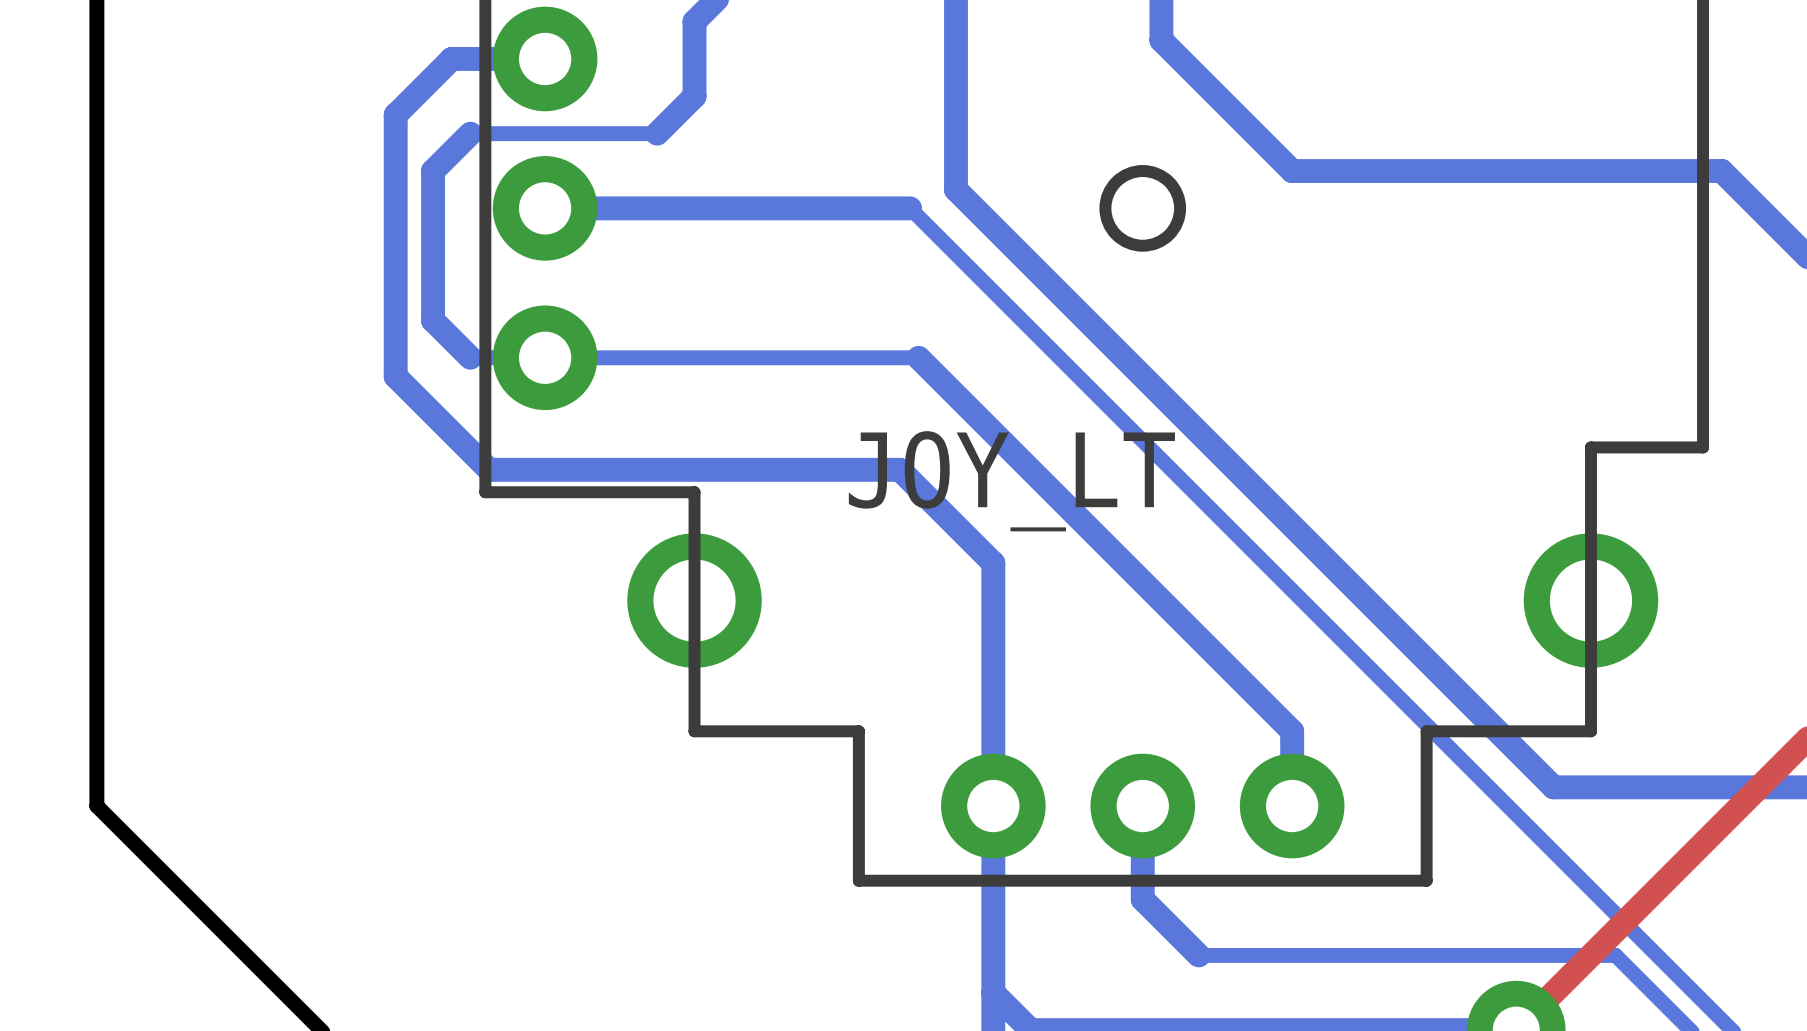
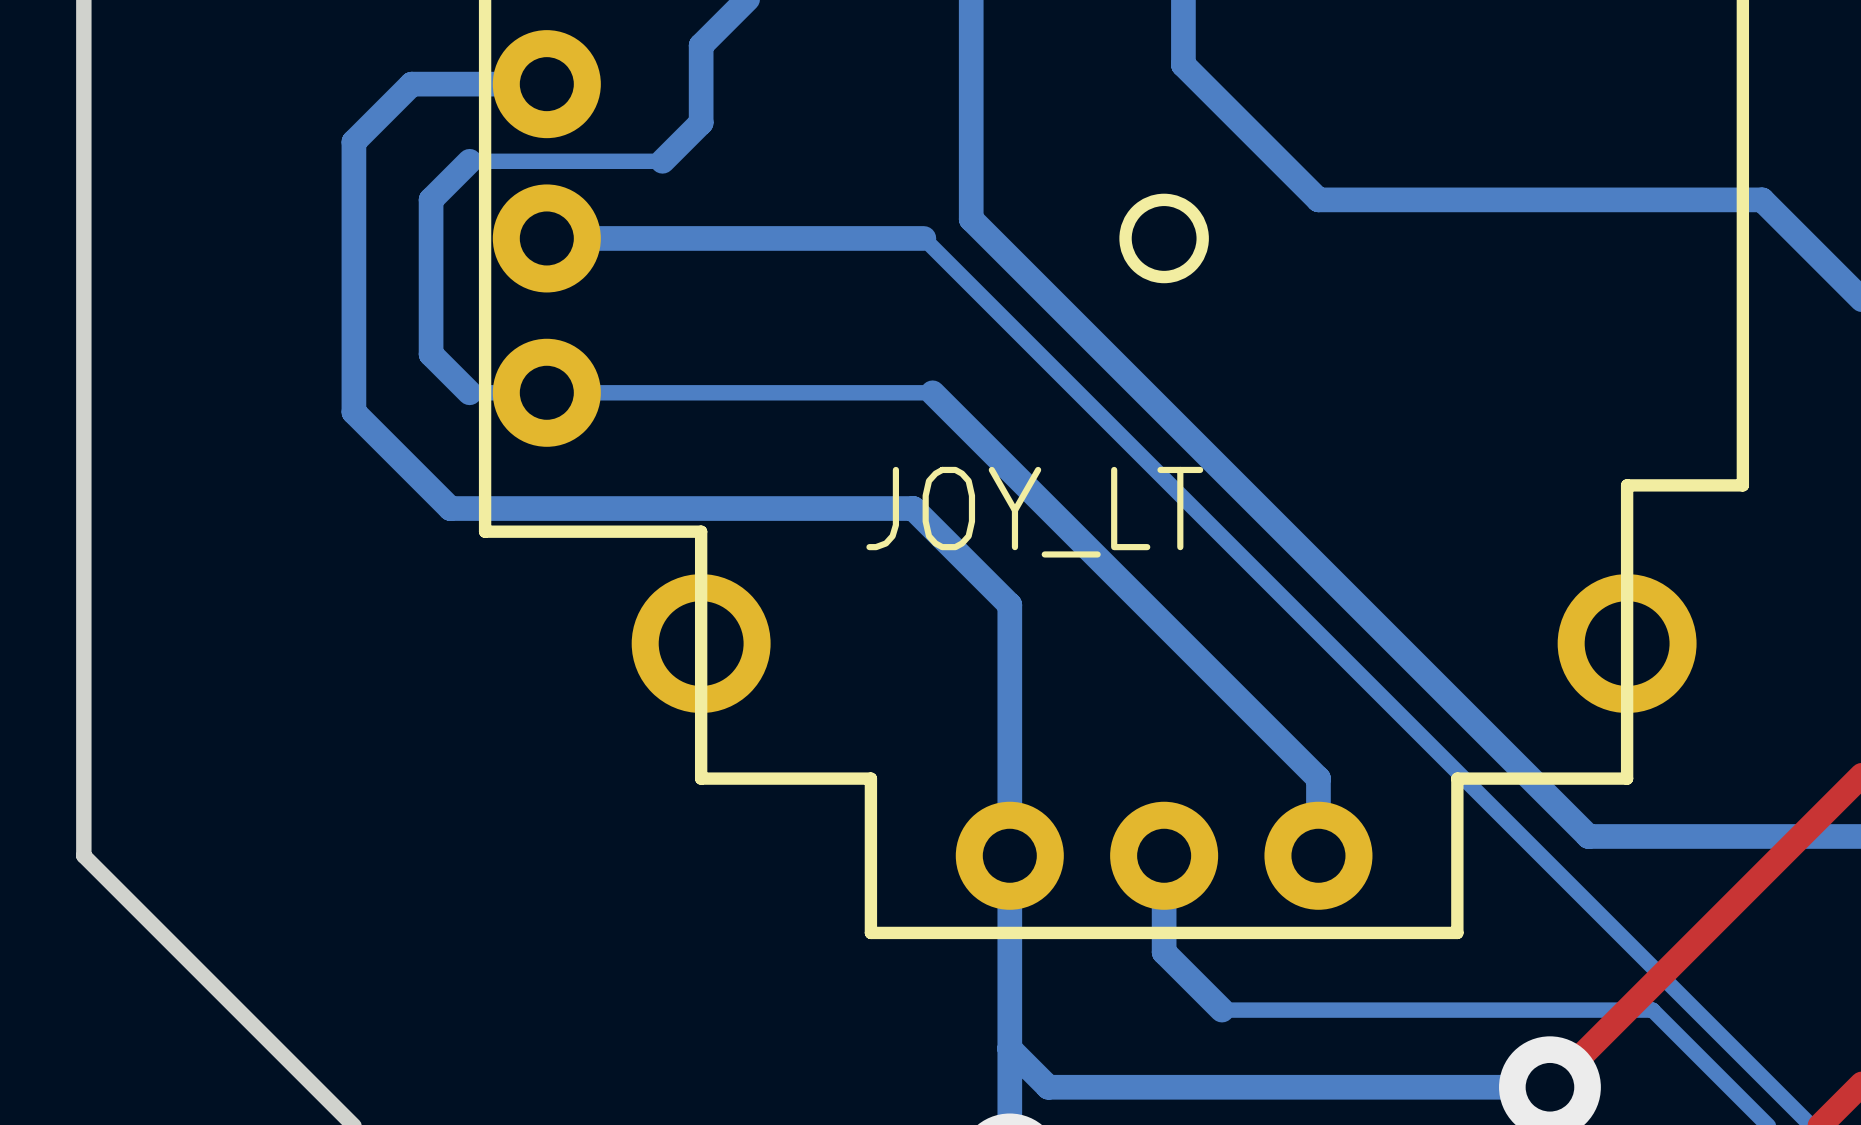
bottom track: (451, 58) (395, 114) (395, 376) (489, 469) -> (450, 84) (411, 84) (353, 142) (353, 412) (450, 508) (488, 508)

